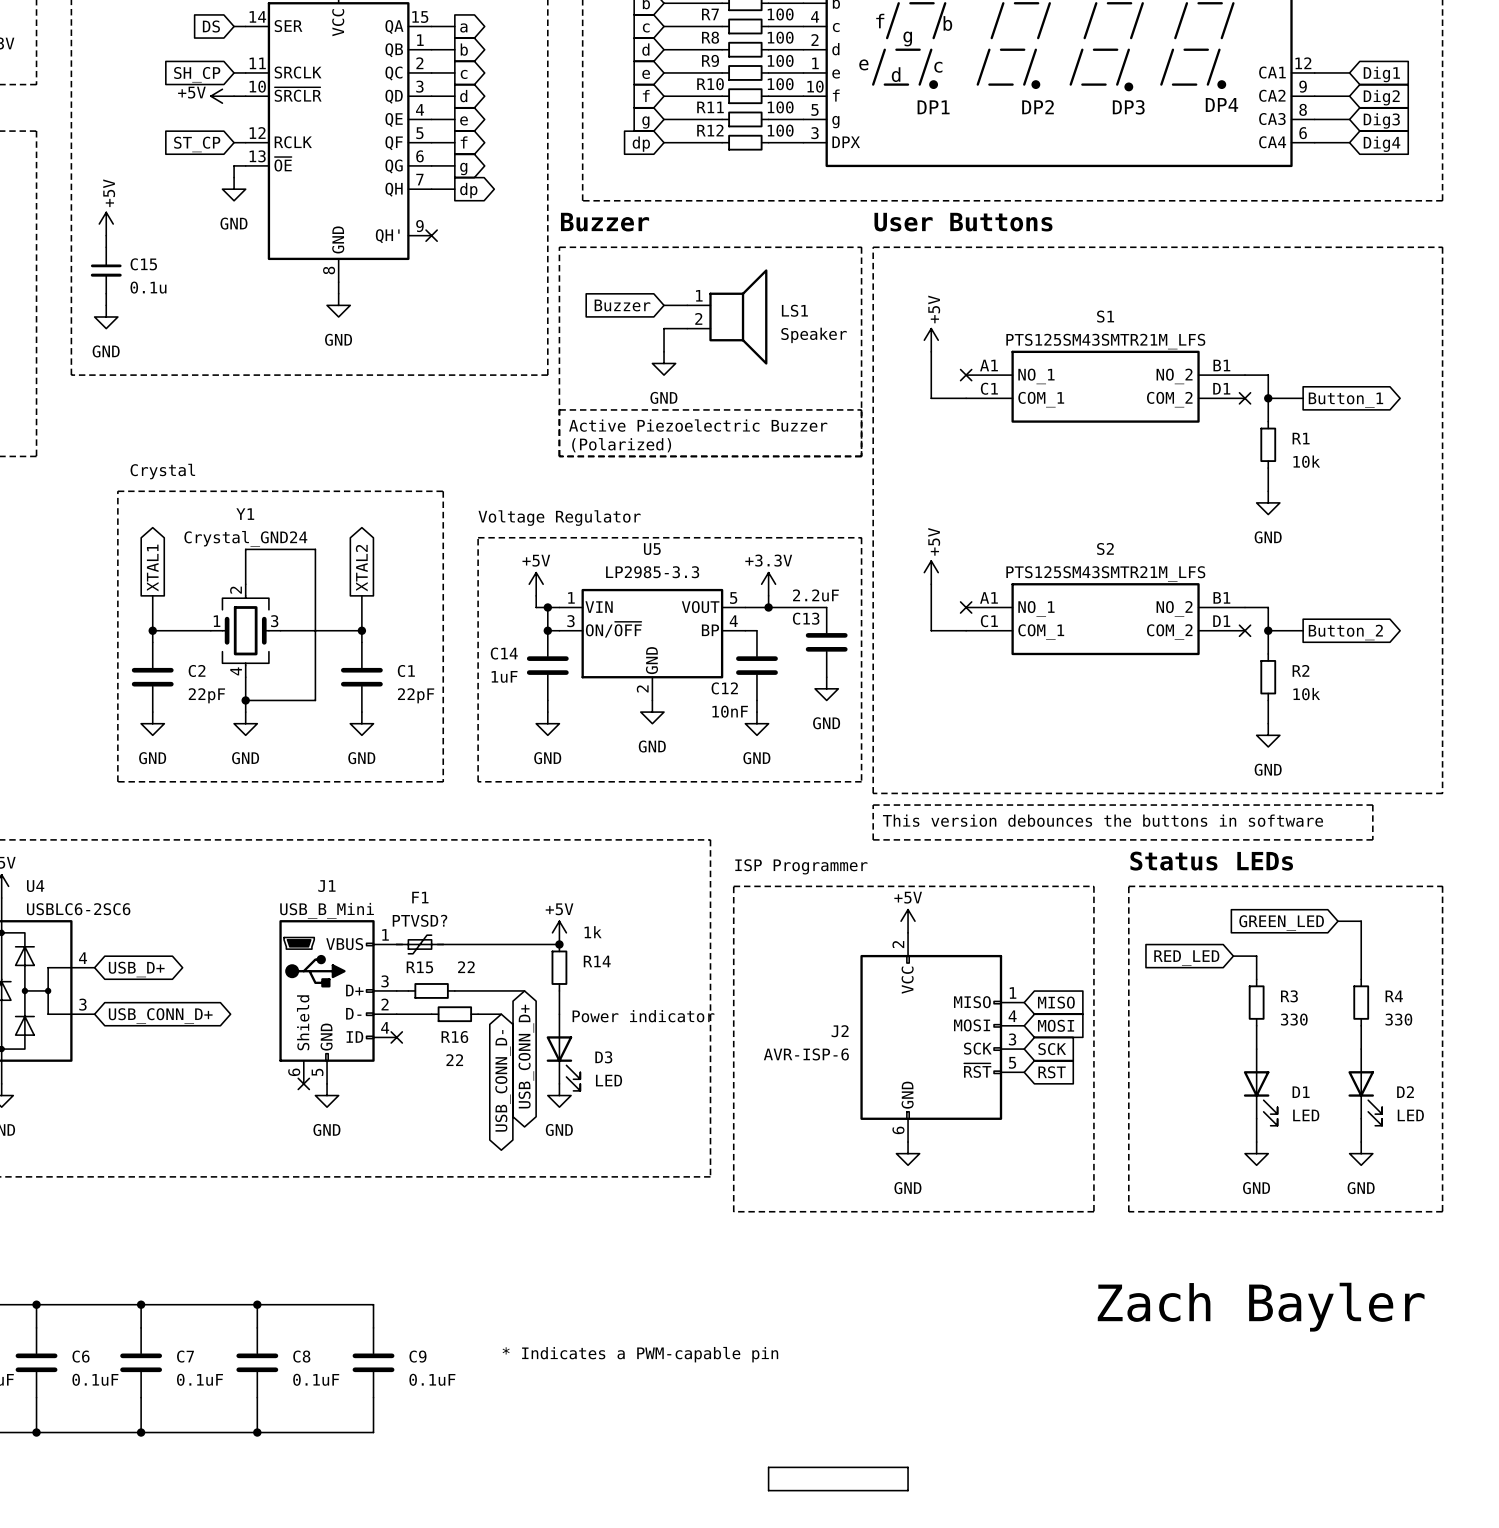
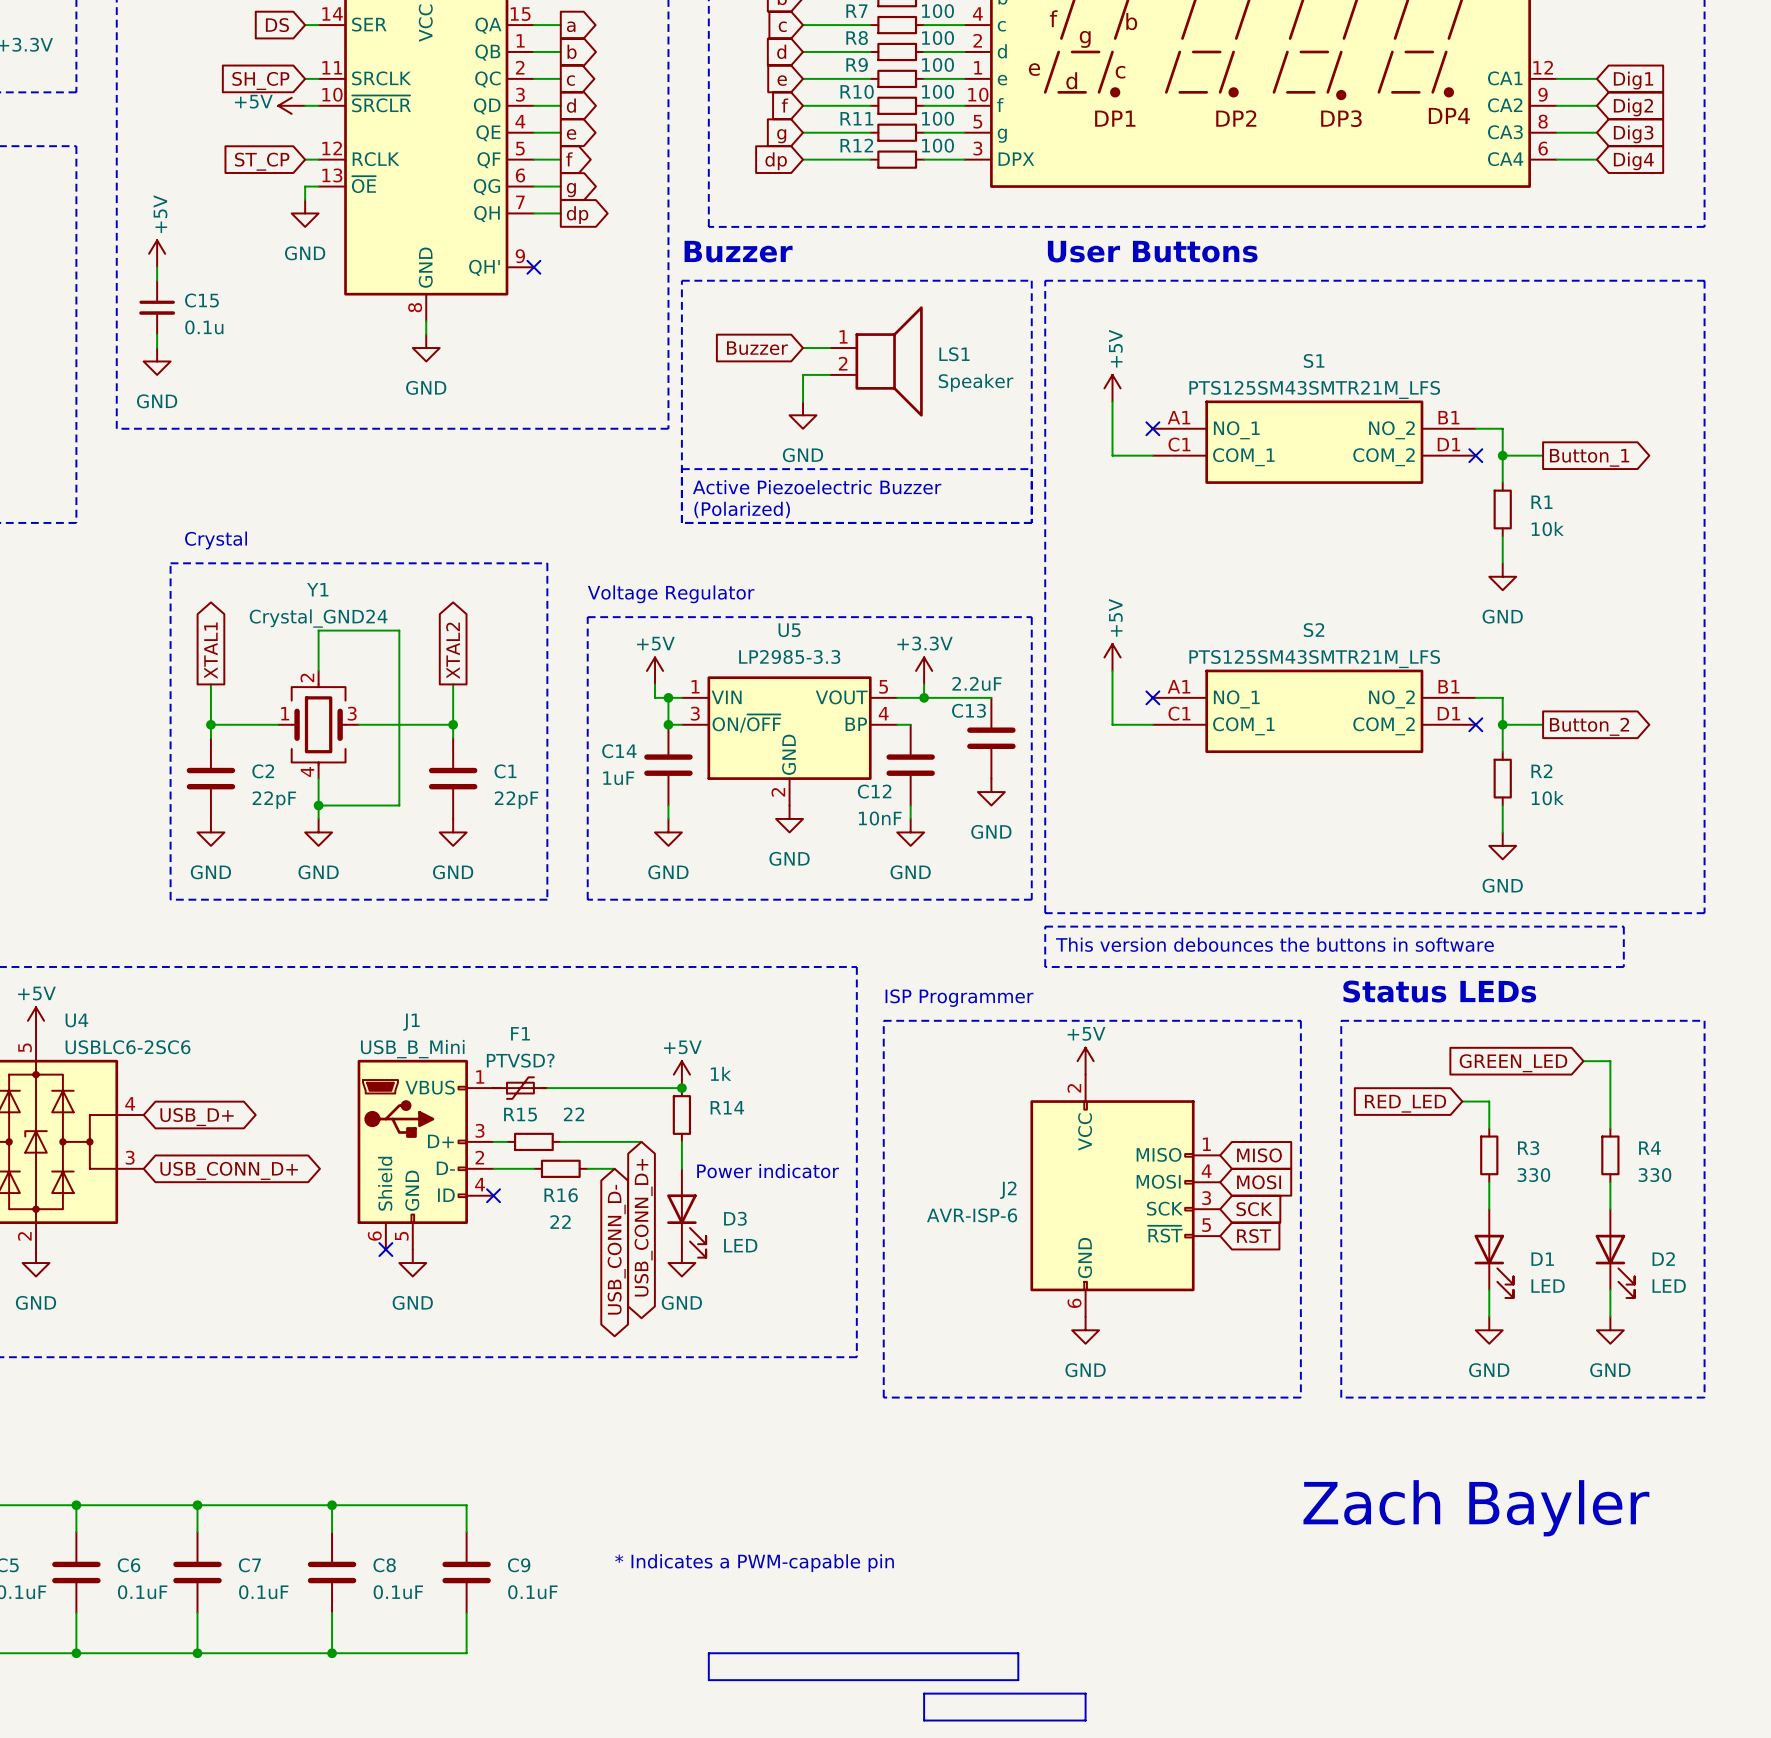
line: none -> (708, 1653) (1018, 1653) (1018, 1680) (708, 1680) (708, 1653)

